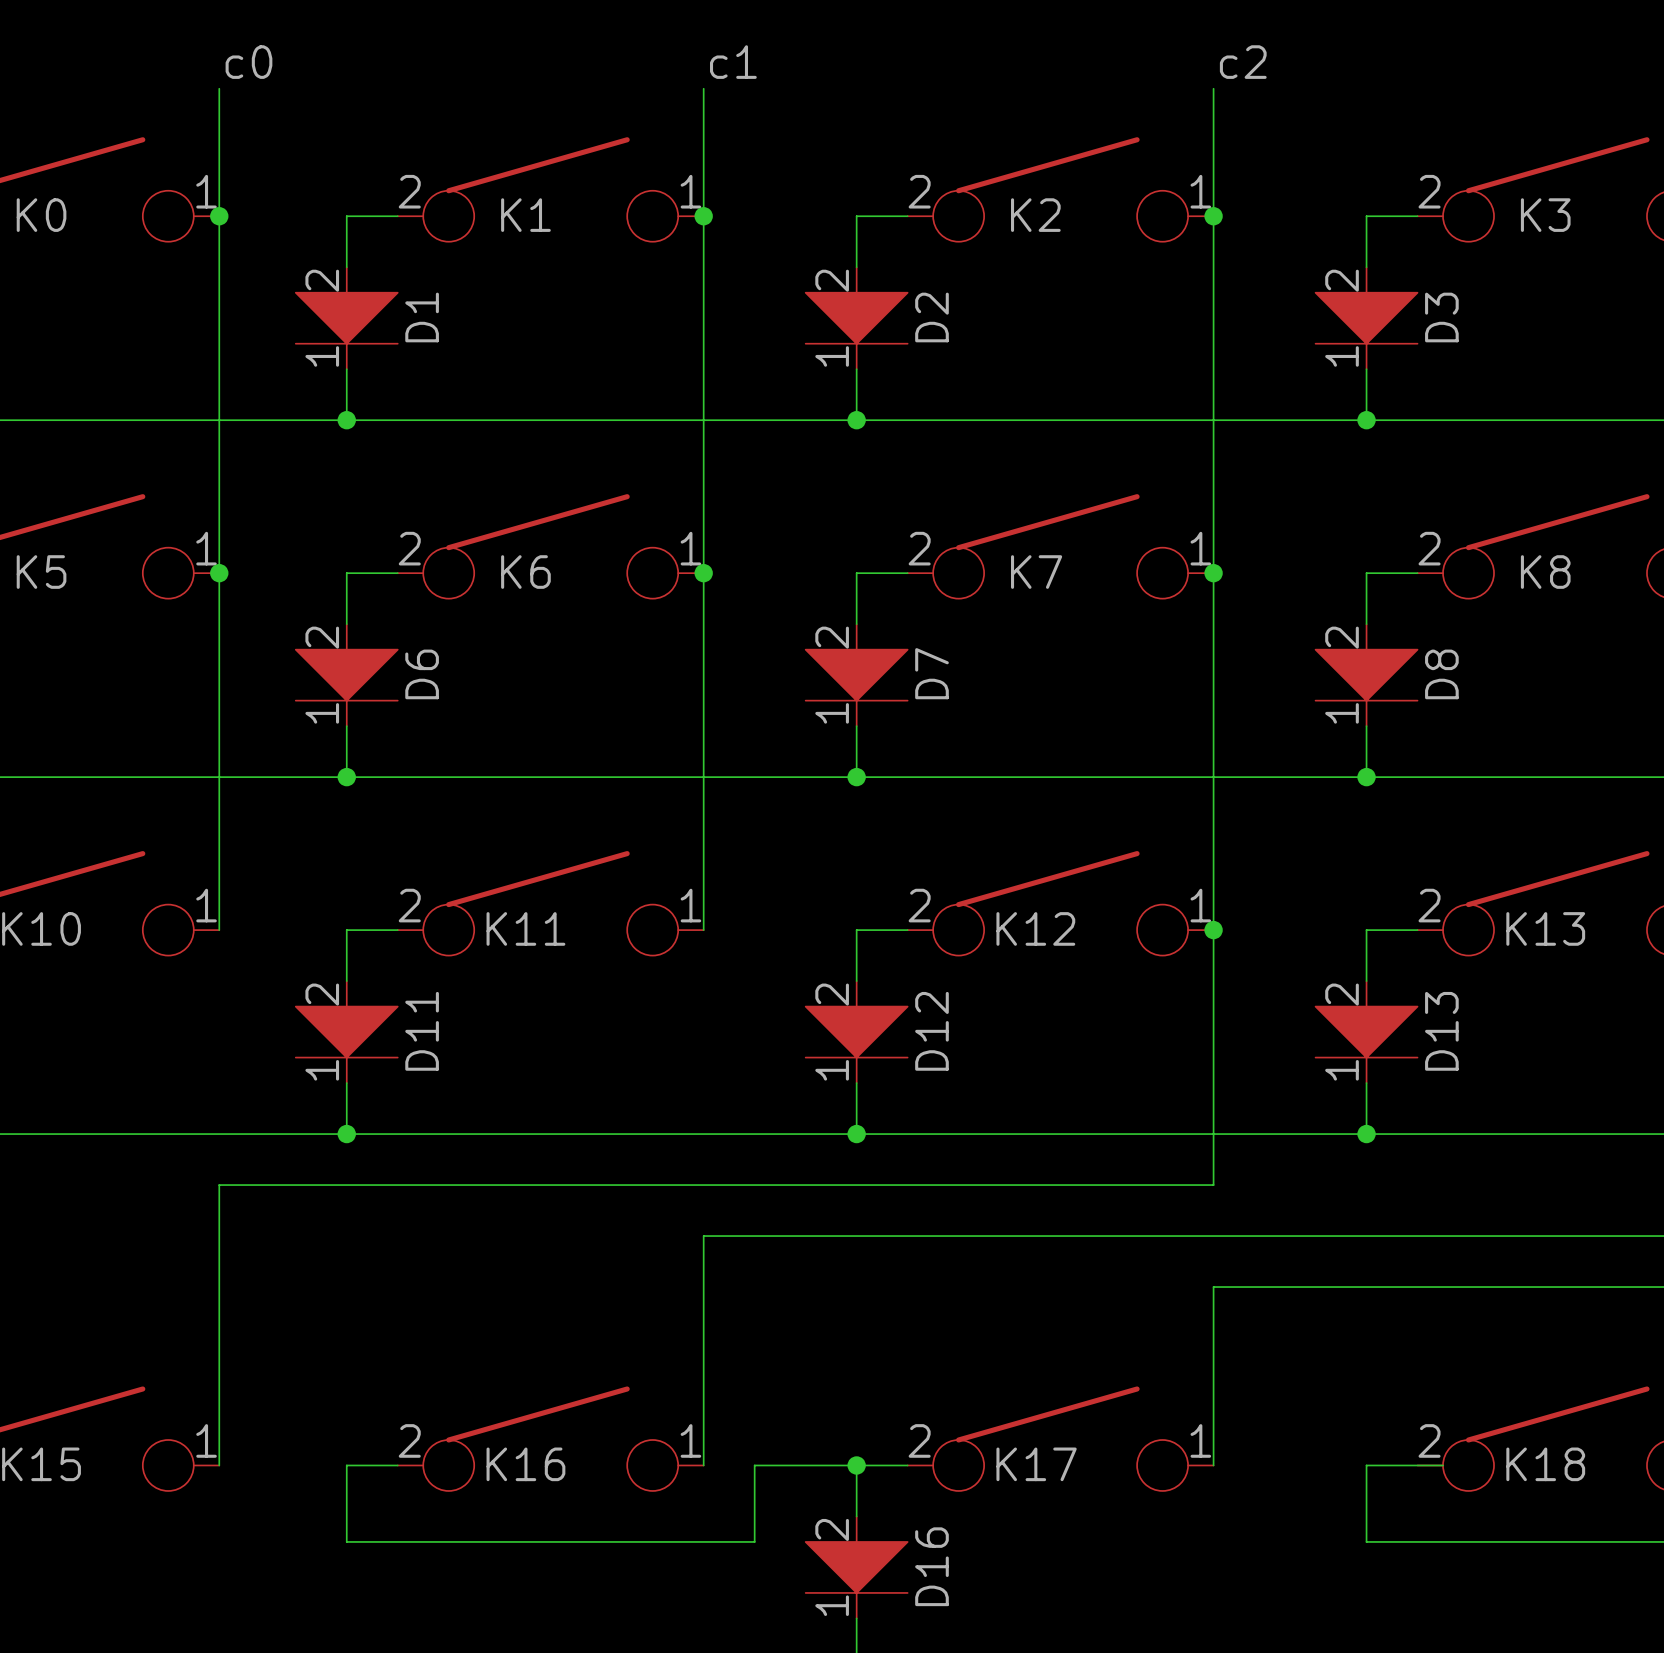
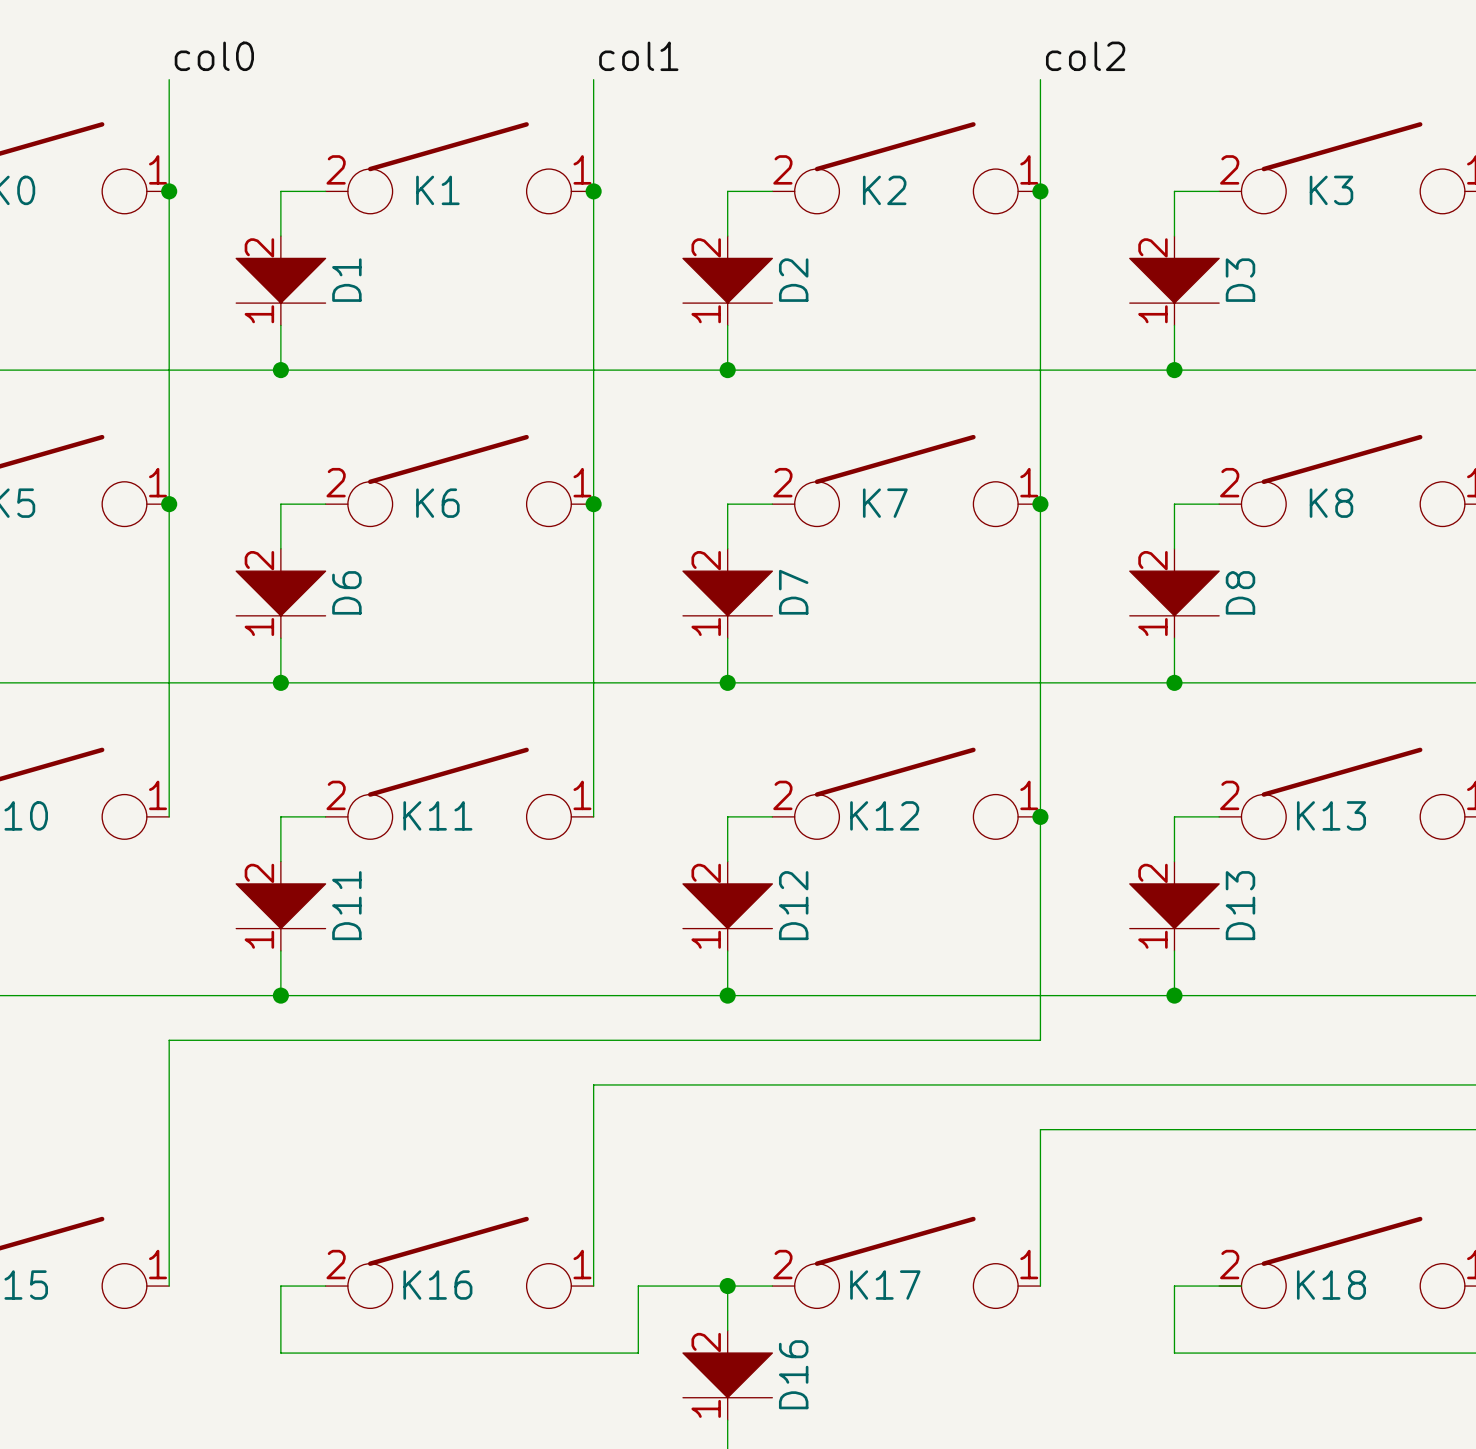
label: c0 (248, 62) -> col0 (214, 56)
label: c1 (733, 62) -> col1 (638, 56)
label: c2 (1243, 62) -> col2 (1085, 56)

